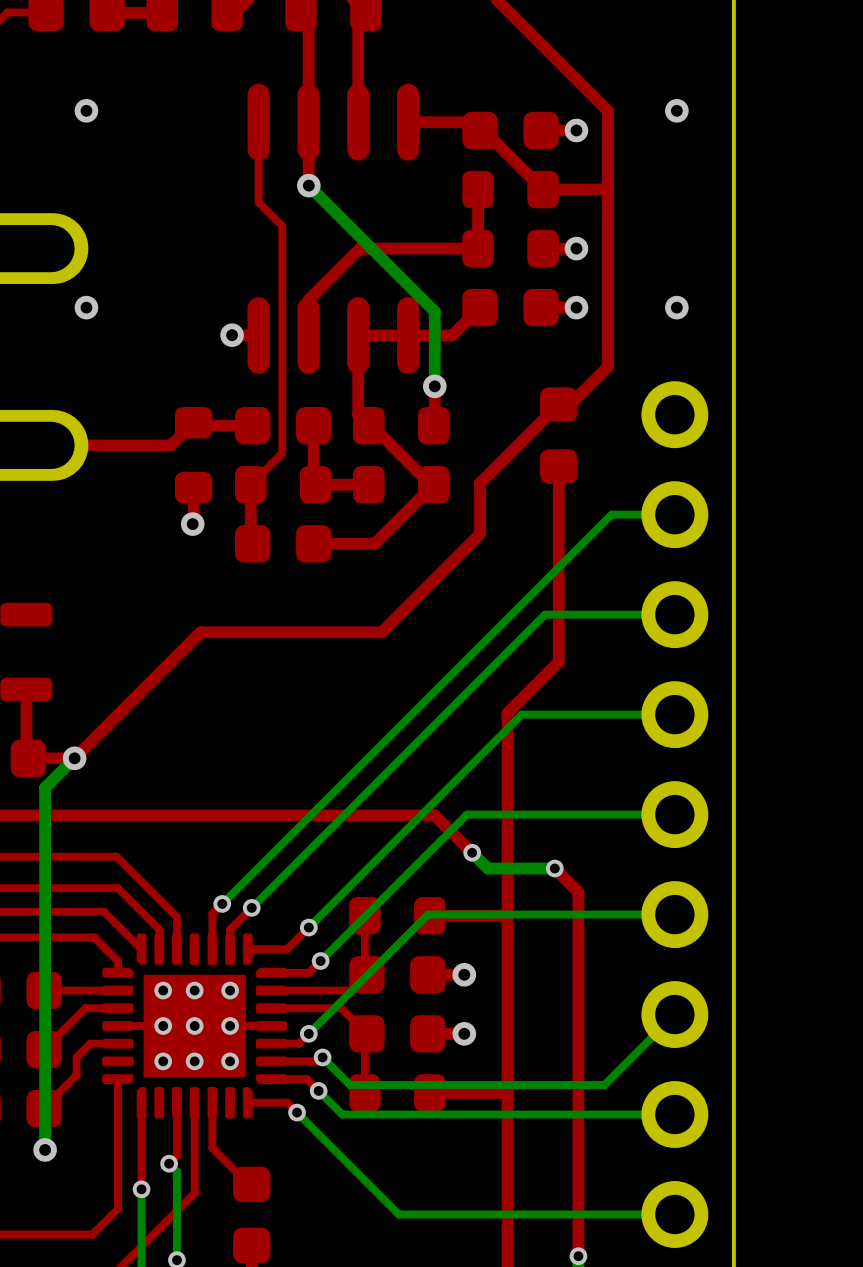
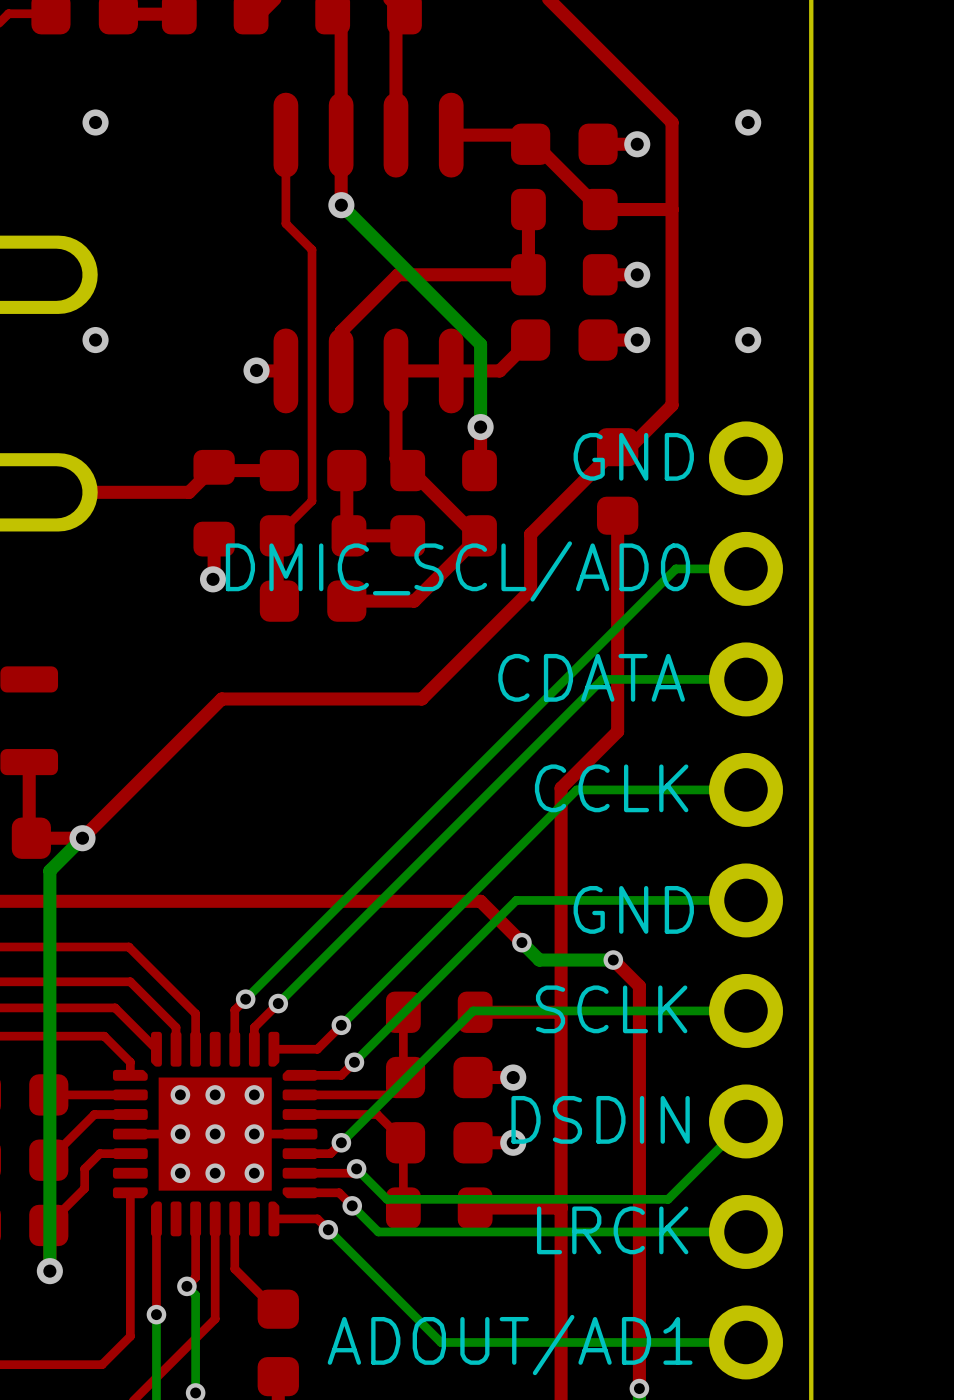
text: none -> GND (633, 456)
text: none -> DMIC_SCL/AD0 (457, 571)
text: none -> CDATA (591, 677)
text: none -> CCLK (611, 788)
text: none -> GND (633, 909)
text: none -> SCLK (611, 1009)
text: none -> DSDIN (600, 1119)
text: none -> LRCK (612, 1230)
text: none -> ADOUT/AD1 (510, 1345)

